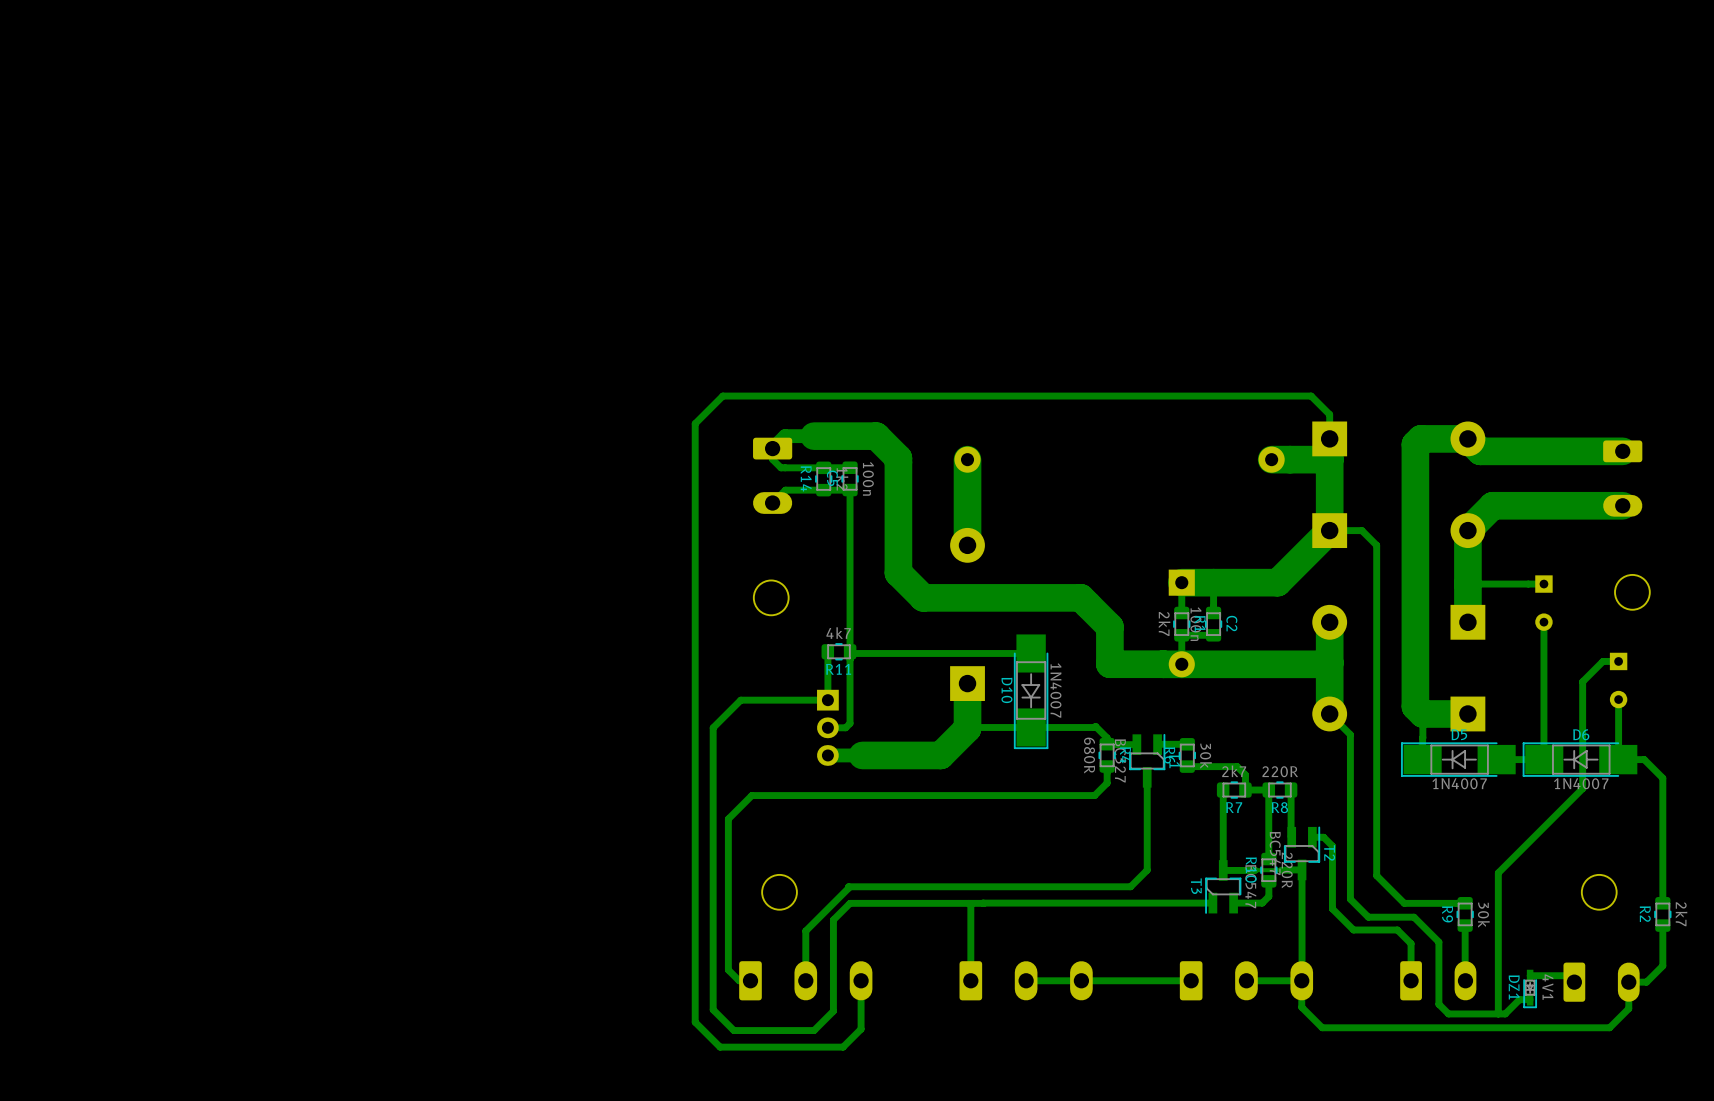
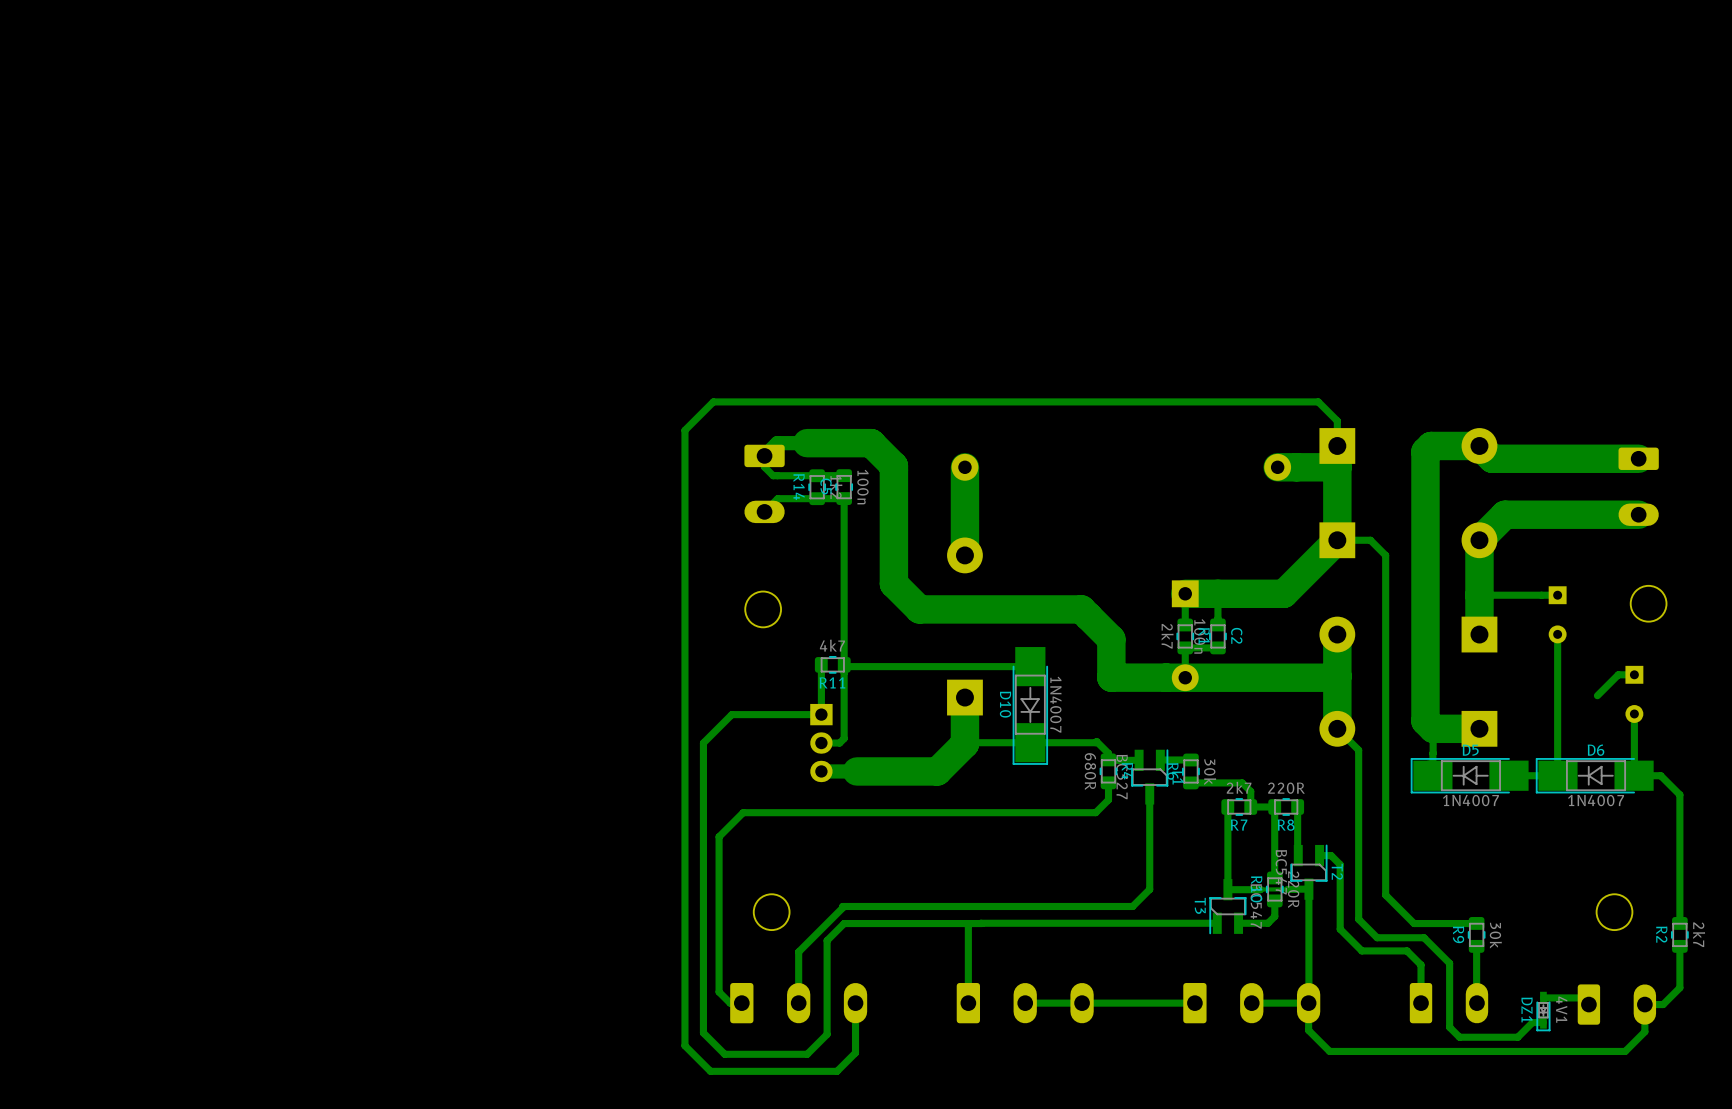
track: (1582, 681) (1582, 788) (1498, 872) (1498, 1013) -> none

